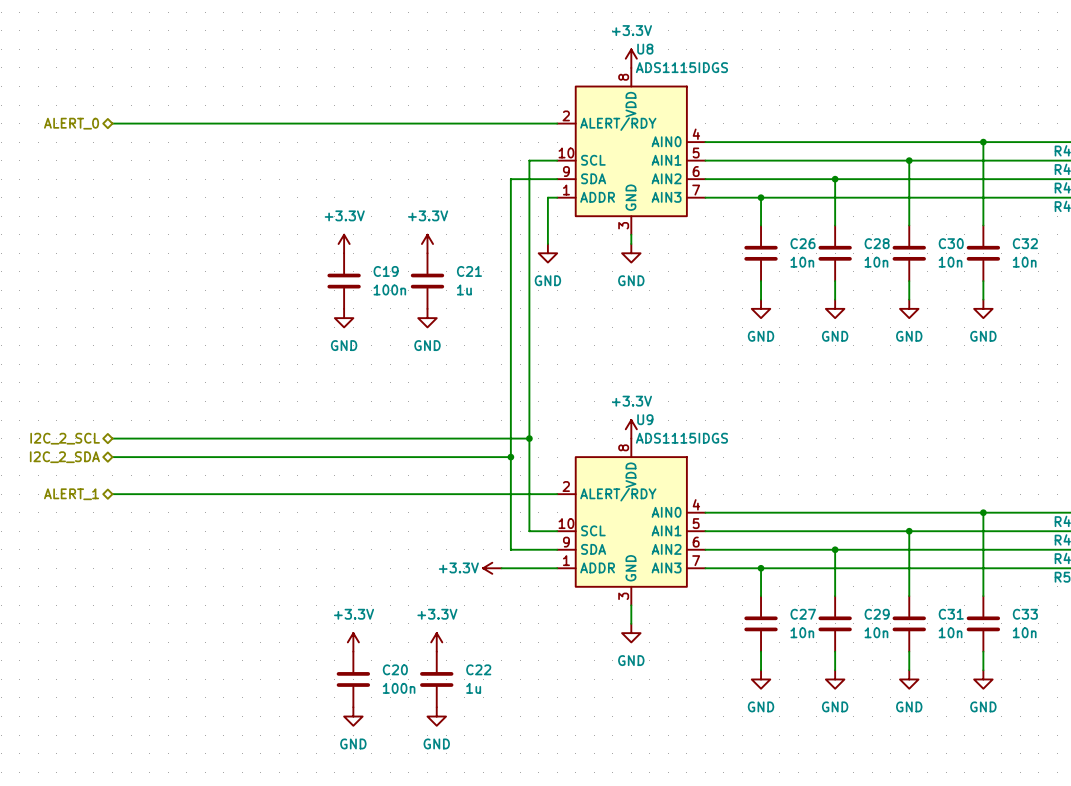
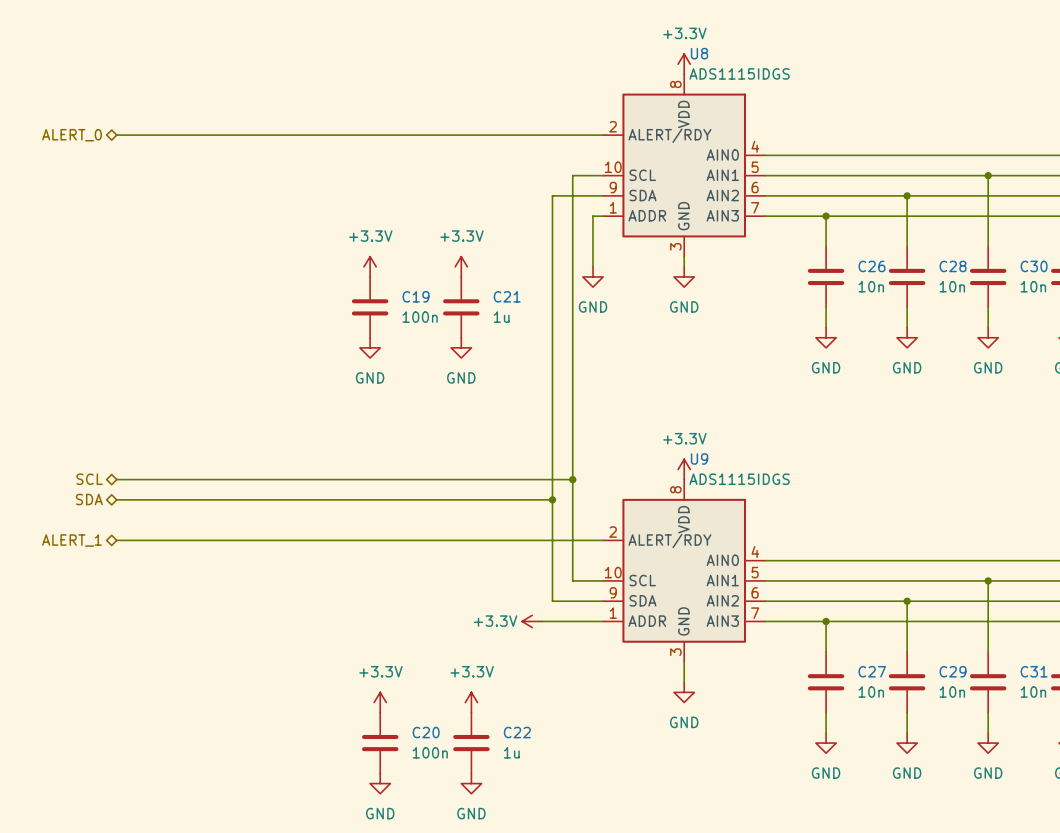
hierarchical label: I2C_2_SCL (65, 438) -> SCL (89, 479)
hierarchical label: I2C_2_SDA (64, 457) -> SDA (89, 499)

